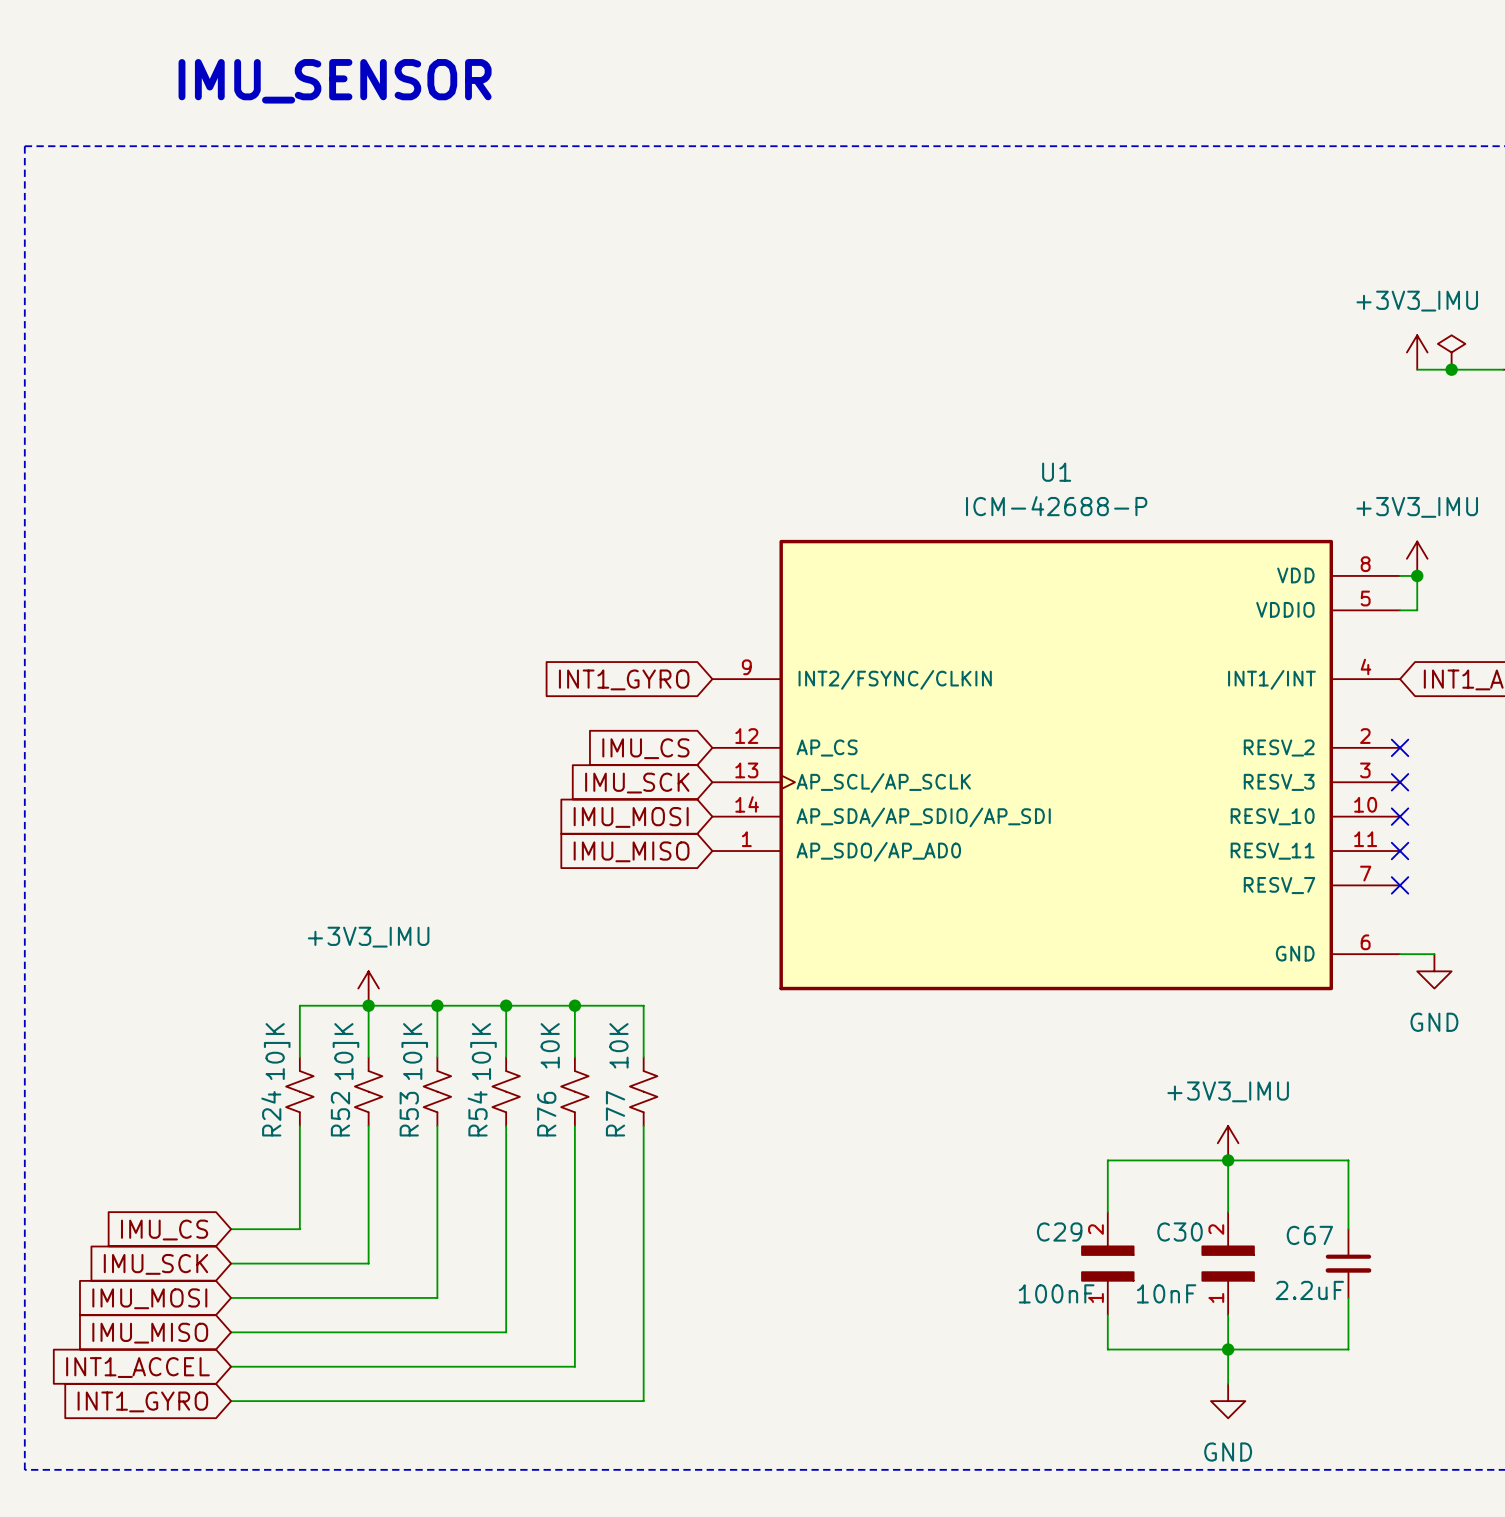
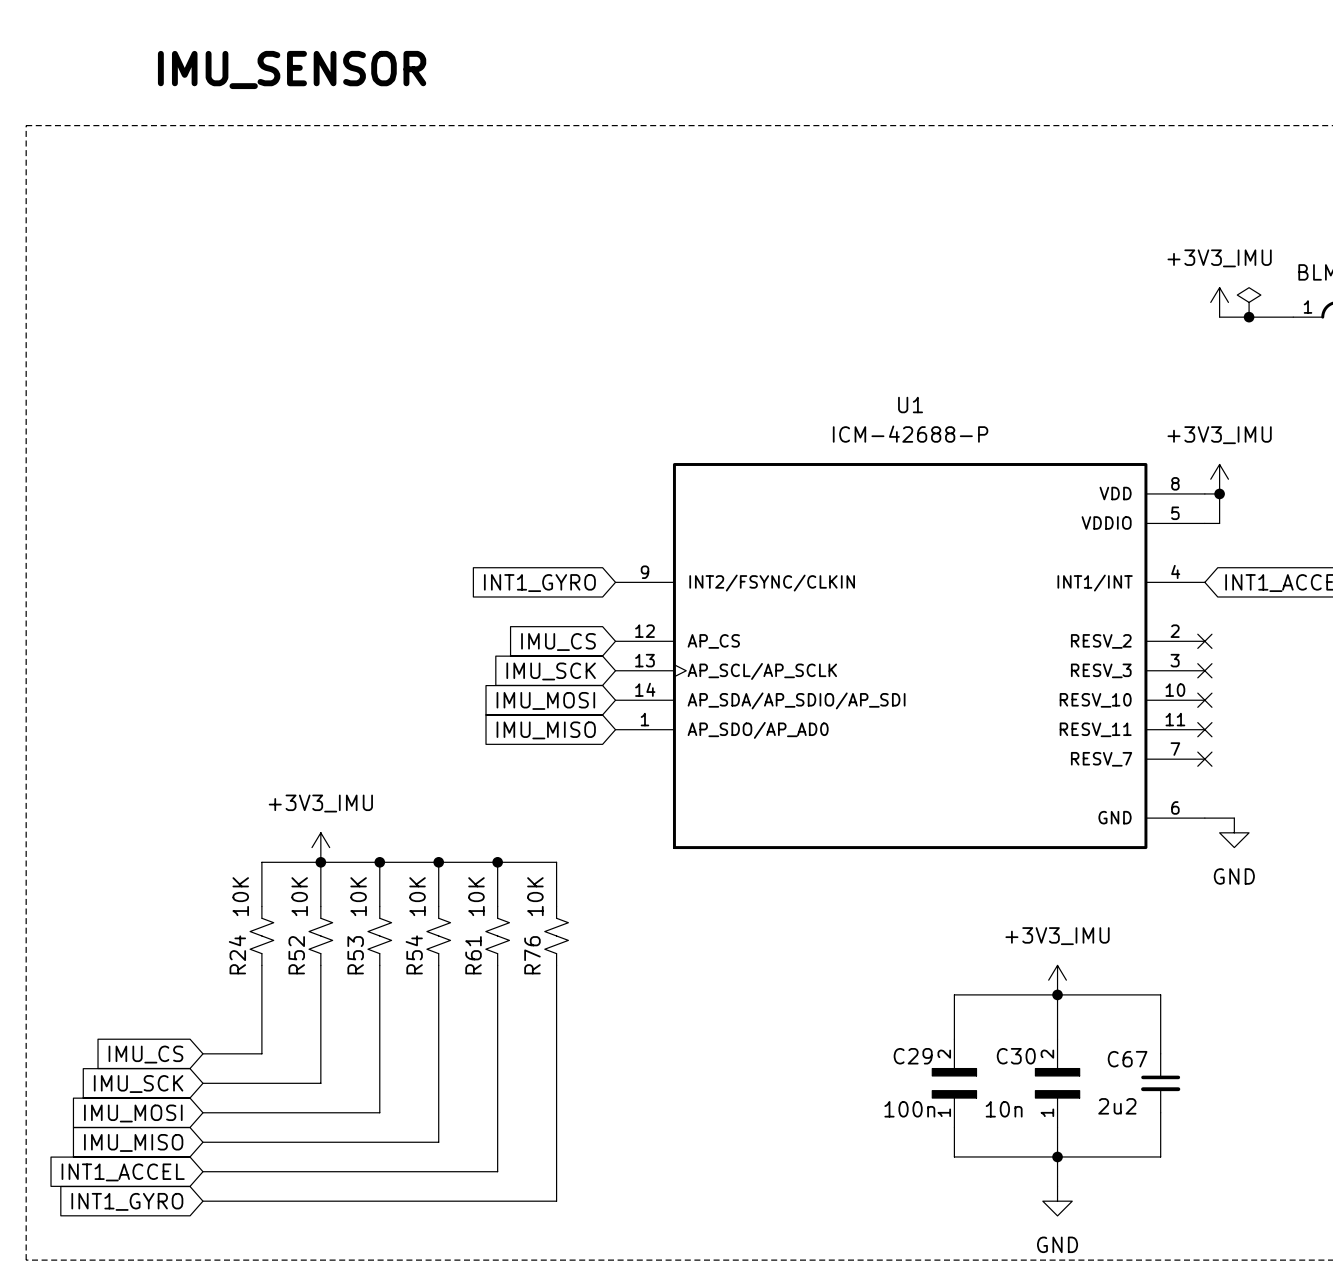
R24 value: 10]K (277, 1051) -> 10K (240, 896)
R52 value: 10]K (345, 1051) -> 10K (299, 896)
R53 value: 10]K (414, 1051) -> 10K (358, 896)
R54 value: 10]K (483, 1051) -> 10K (417, 896)
R77 name: R77 (615, 1113) -> R76 (532, 955)
R76 name: R76 (546, 1114) -> R61 (473, 955)
C67 value: 2.2uF (1309, 1290) -> 2u2 (1117, 1106)
C29 value: 100nF (1056, 1293) -> 100n (909, 1109)
C30 value: 10nF (1166, 1293) -> 10n (1004, 1109)

